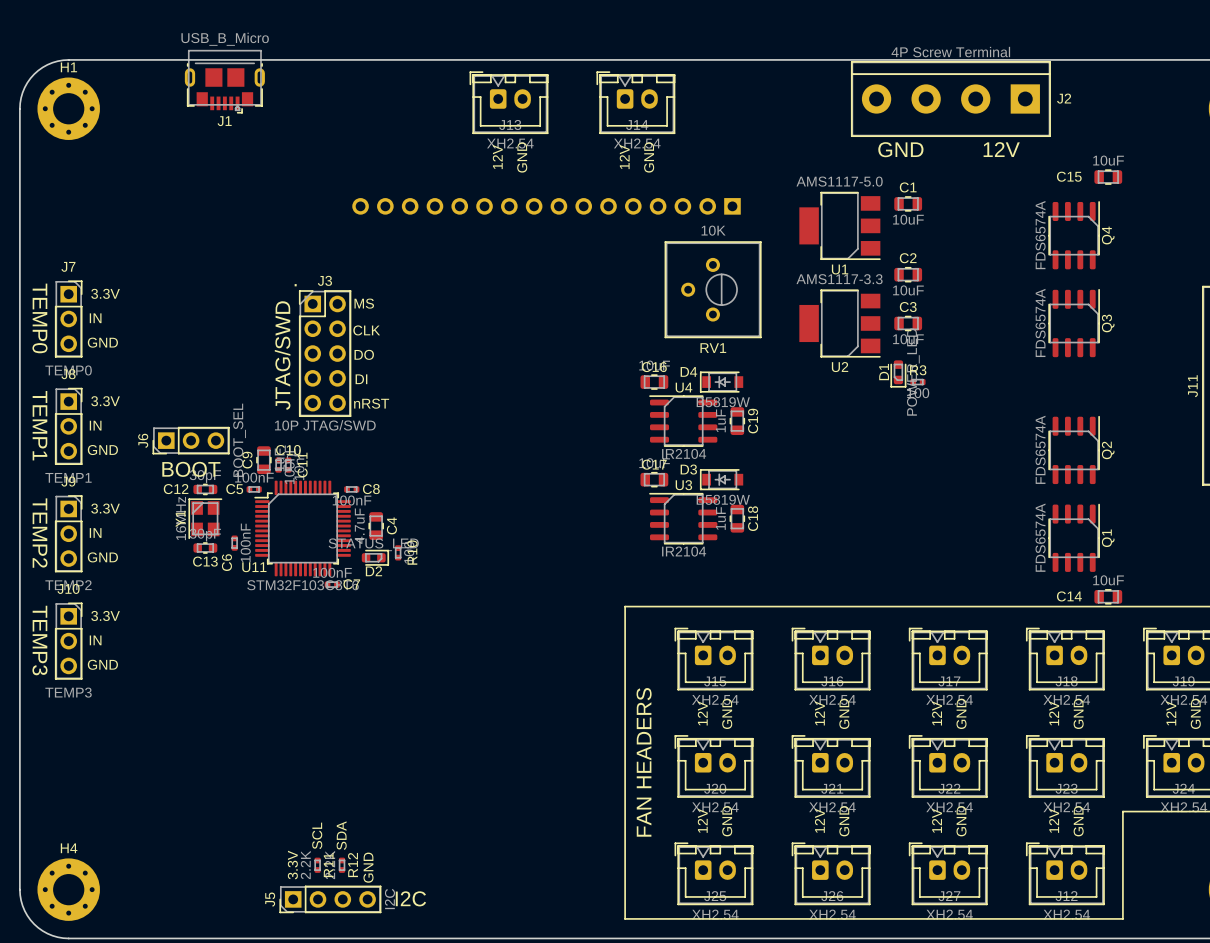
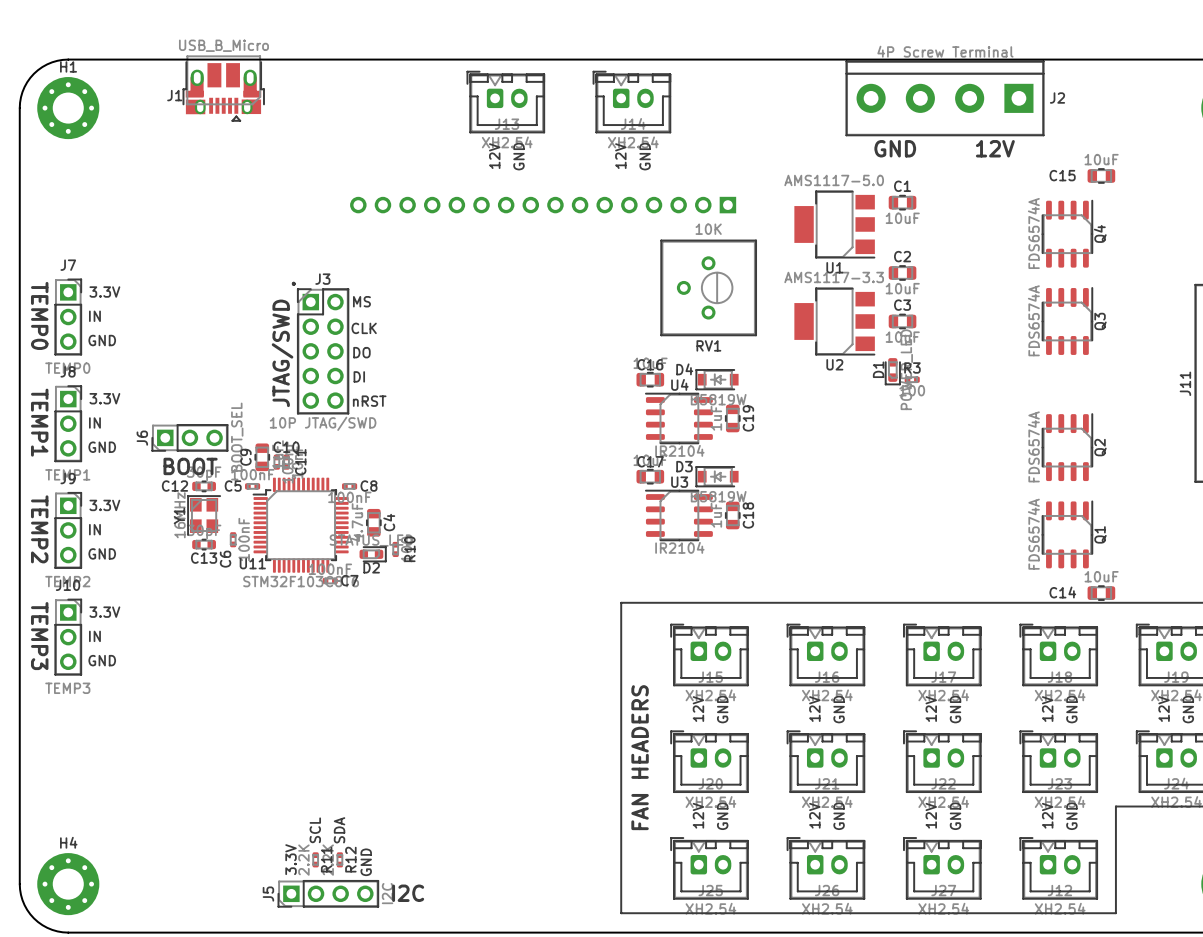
J1 footprint: [184, 50, 265, 114] -> [182, 55, 265, 122]
J1 name position: J1 (224, 121) -> J1 (174, 95)

